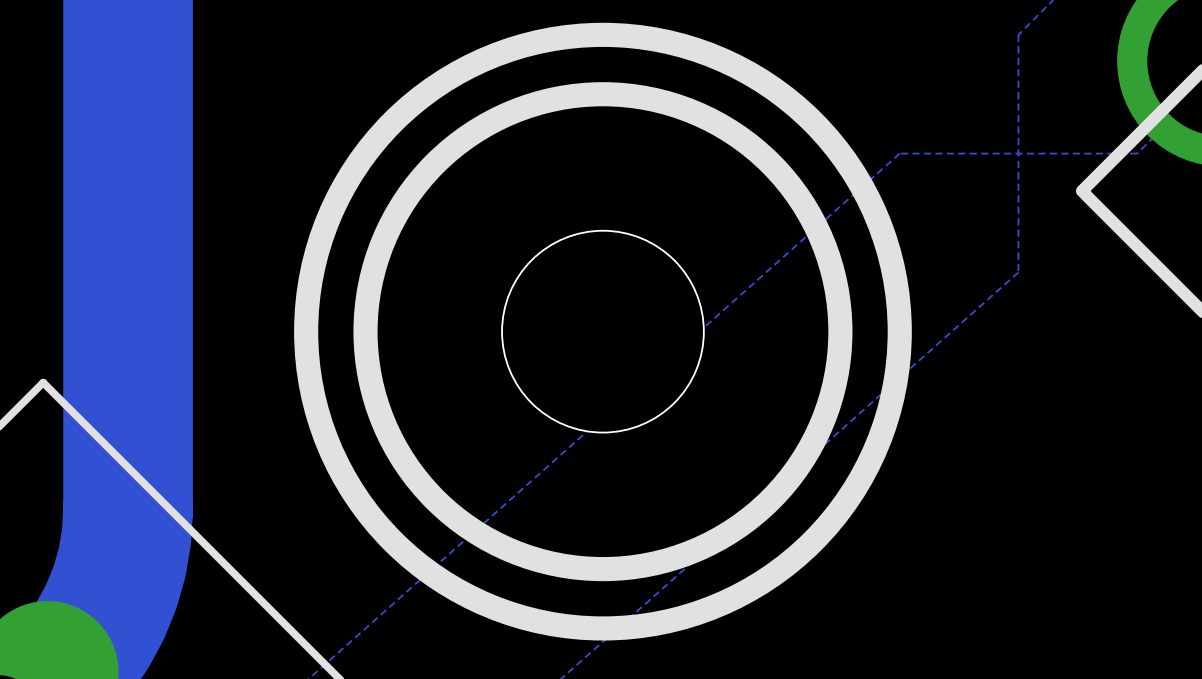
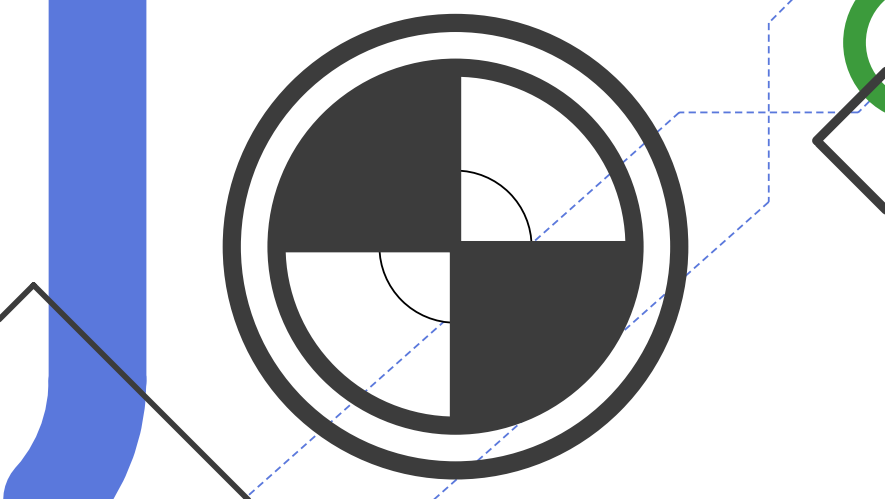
drawing: none -> [270, 61, 641, 432]

